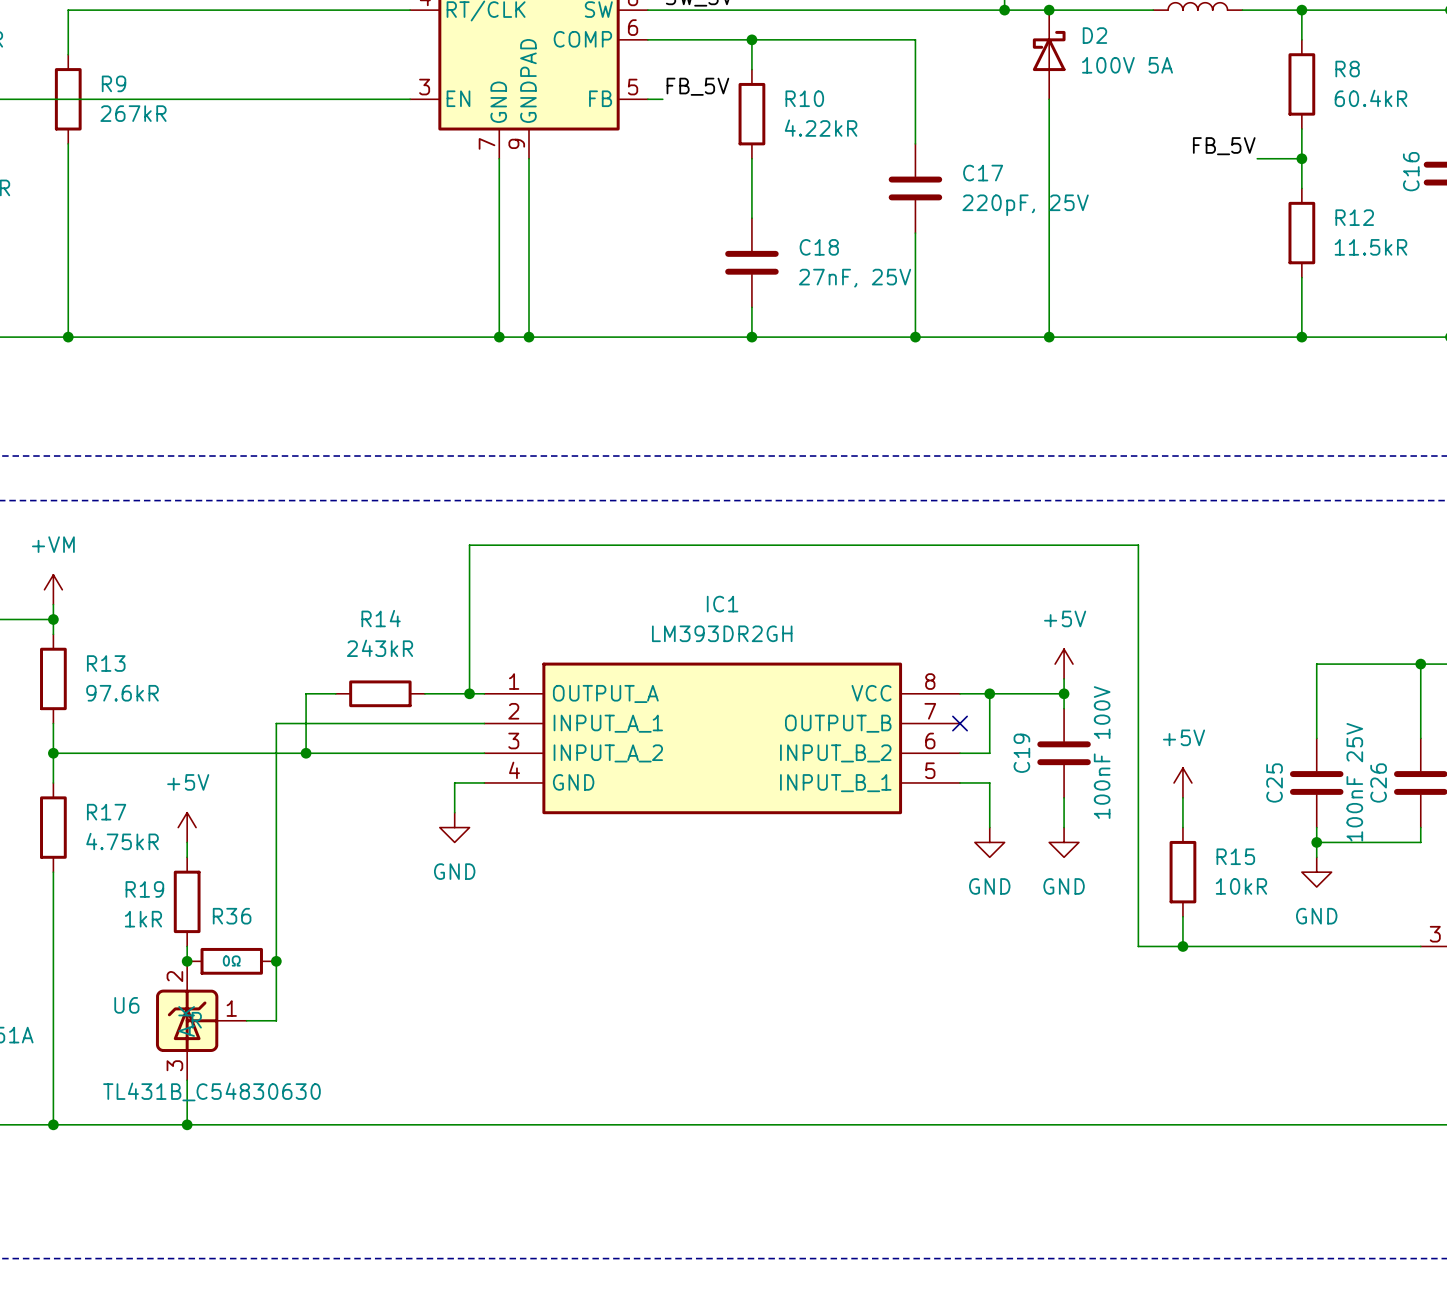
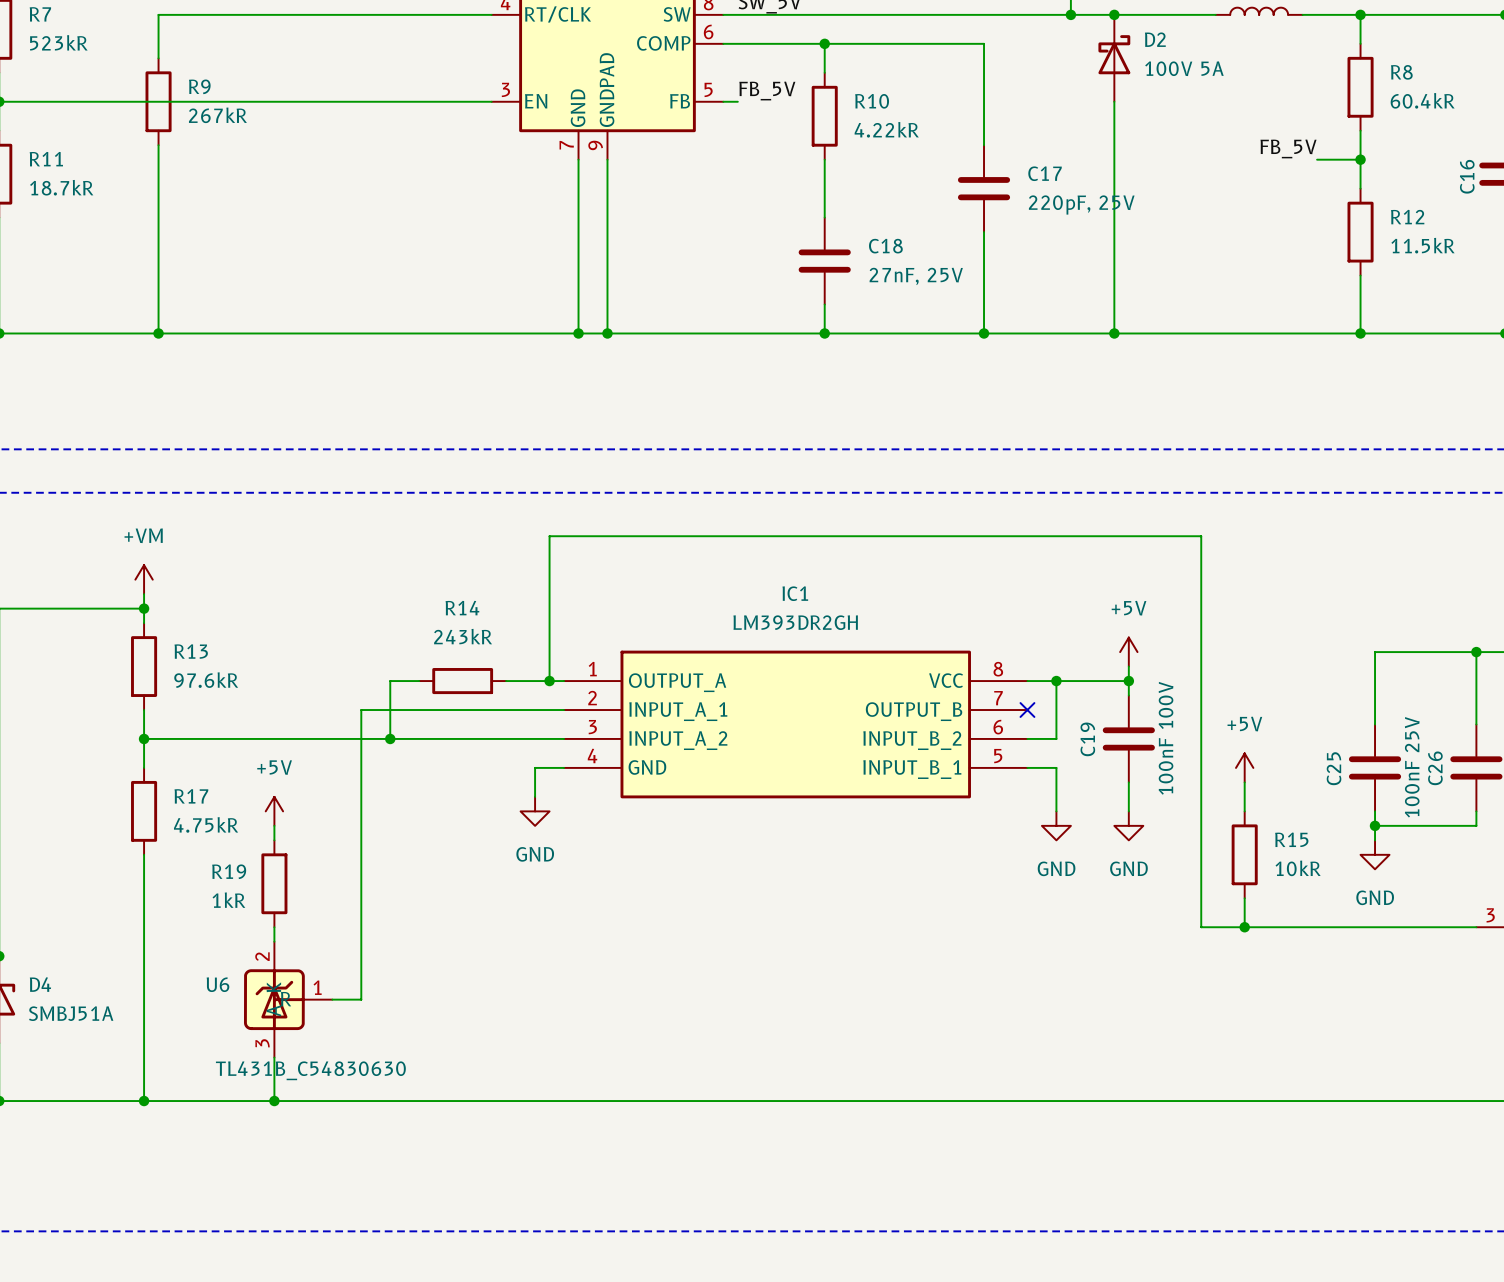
junction: (187, 961) -> none
R36: 0Ω (231, 961) -> none
junction: (276, 961) -> none

